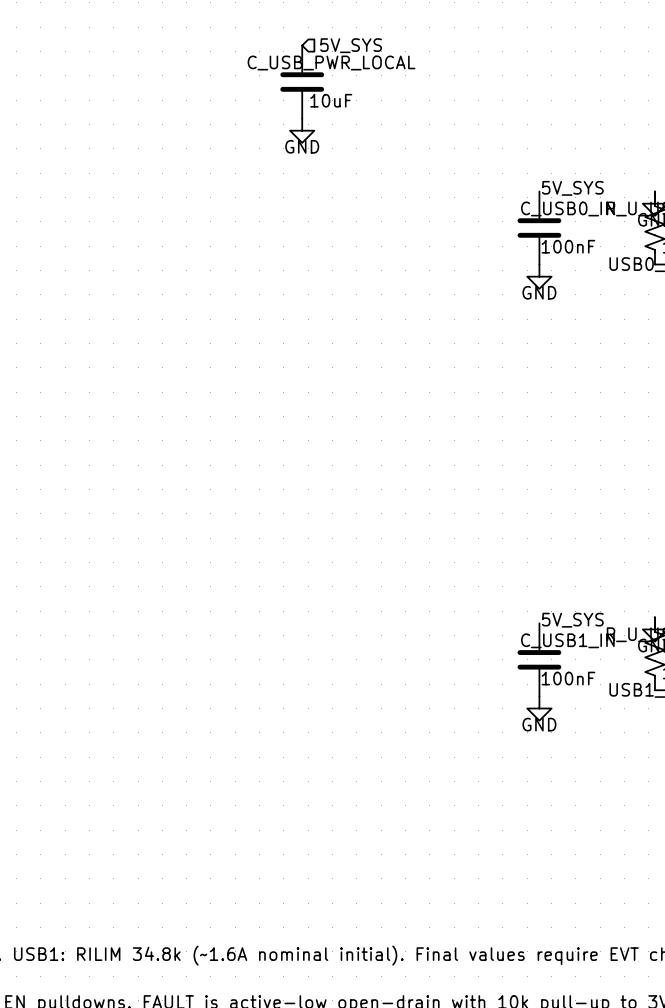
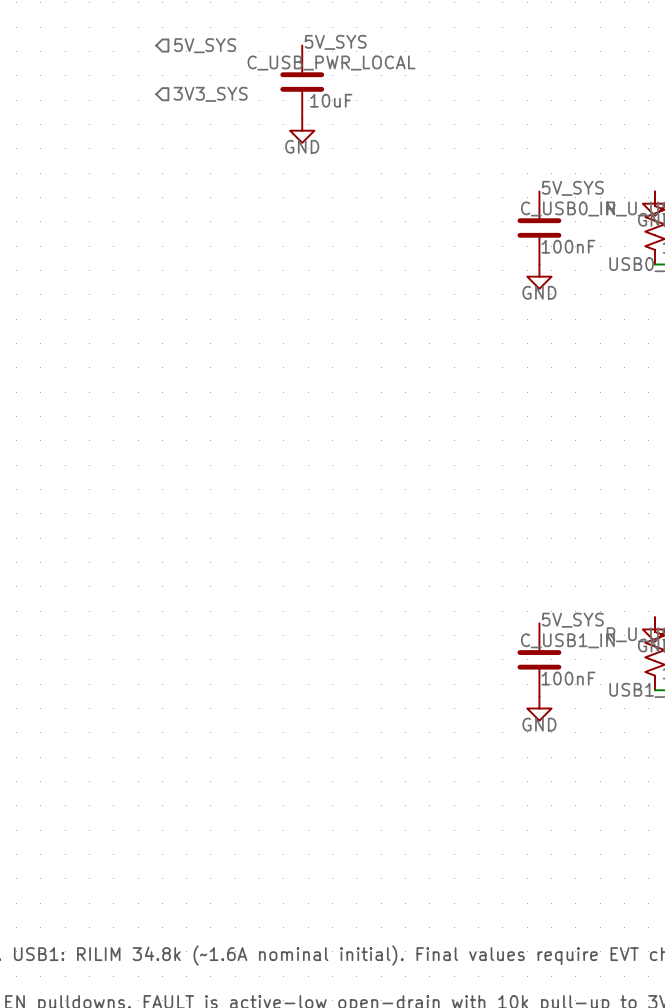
label: none -> 5V_SYS (335, 42)
hierarchical label position: 5V_SYS (351, 45) -> 5V_SYS (205, 45)
hierarchical label: none -> 3V3_SYS (210, 94)

